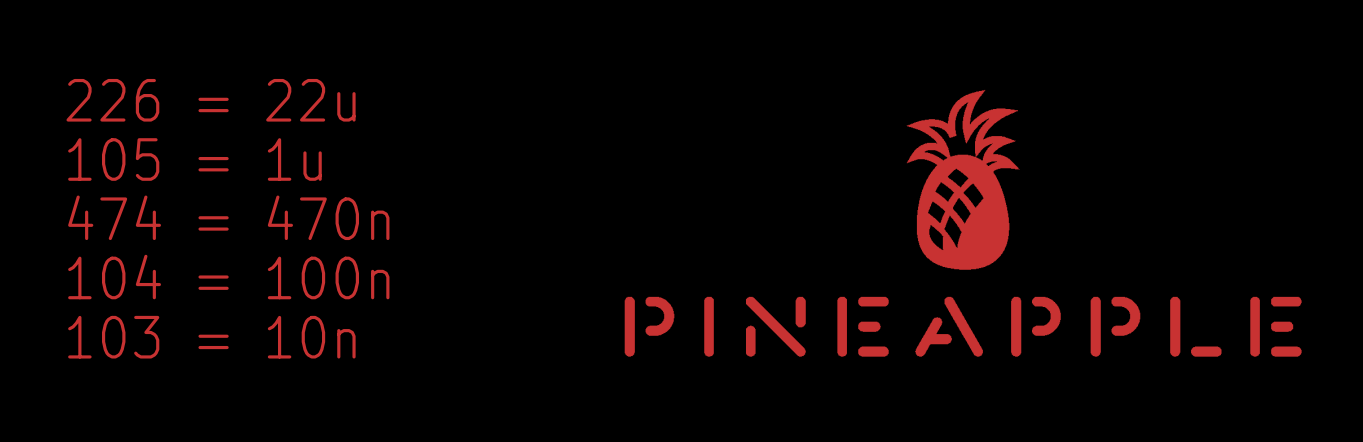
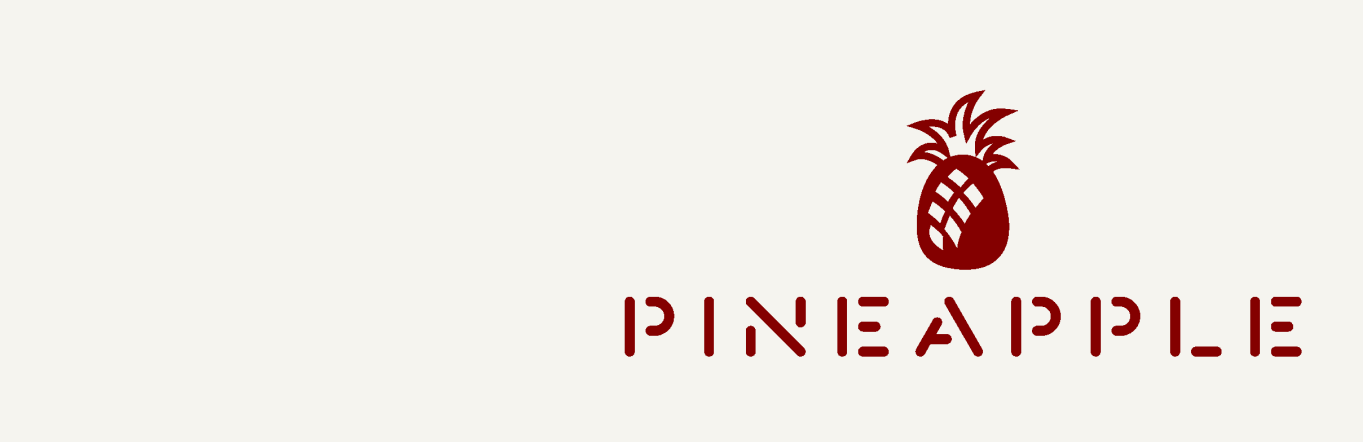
text: 226 = 22u (211, 100) -> none
text: 105 = 1u (194, 159) -> none
text: 474 = 470n (228, 217) -> none
text: 104 = 100n (228, 277) -> none
text: 103 = 10n (211, 337) -> none

